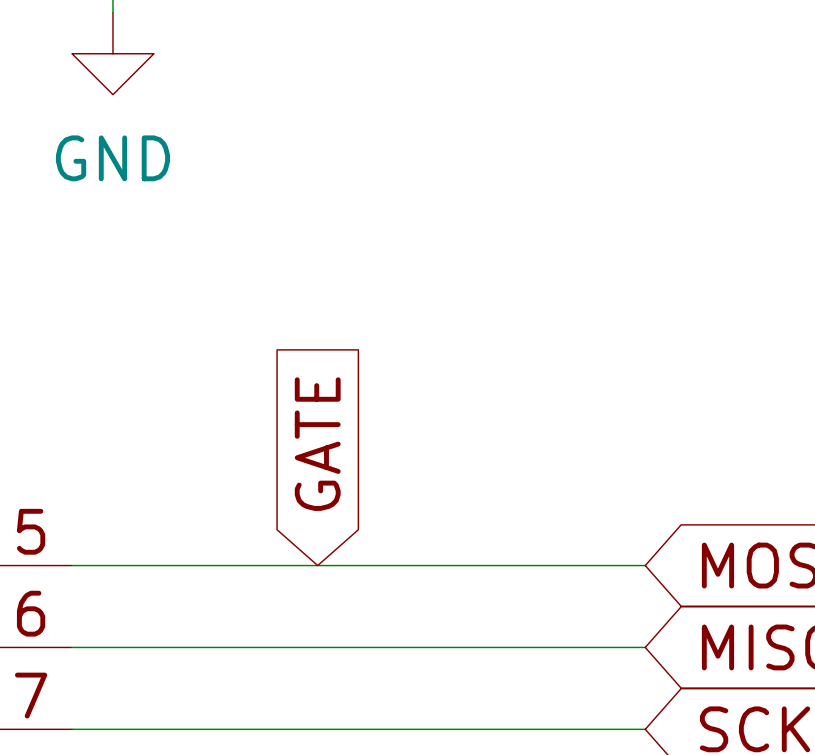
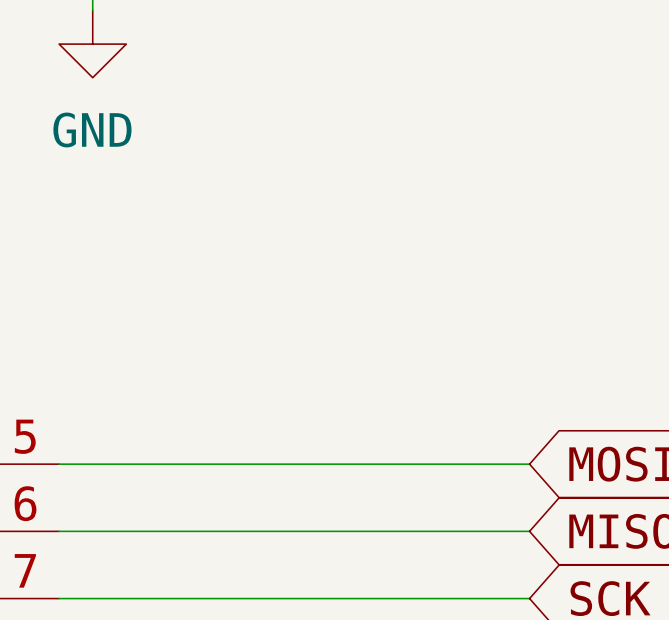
global label: GATE (317, 444) -> none

